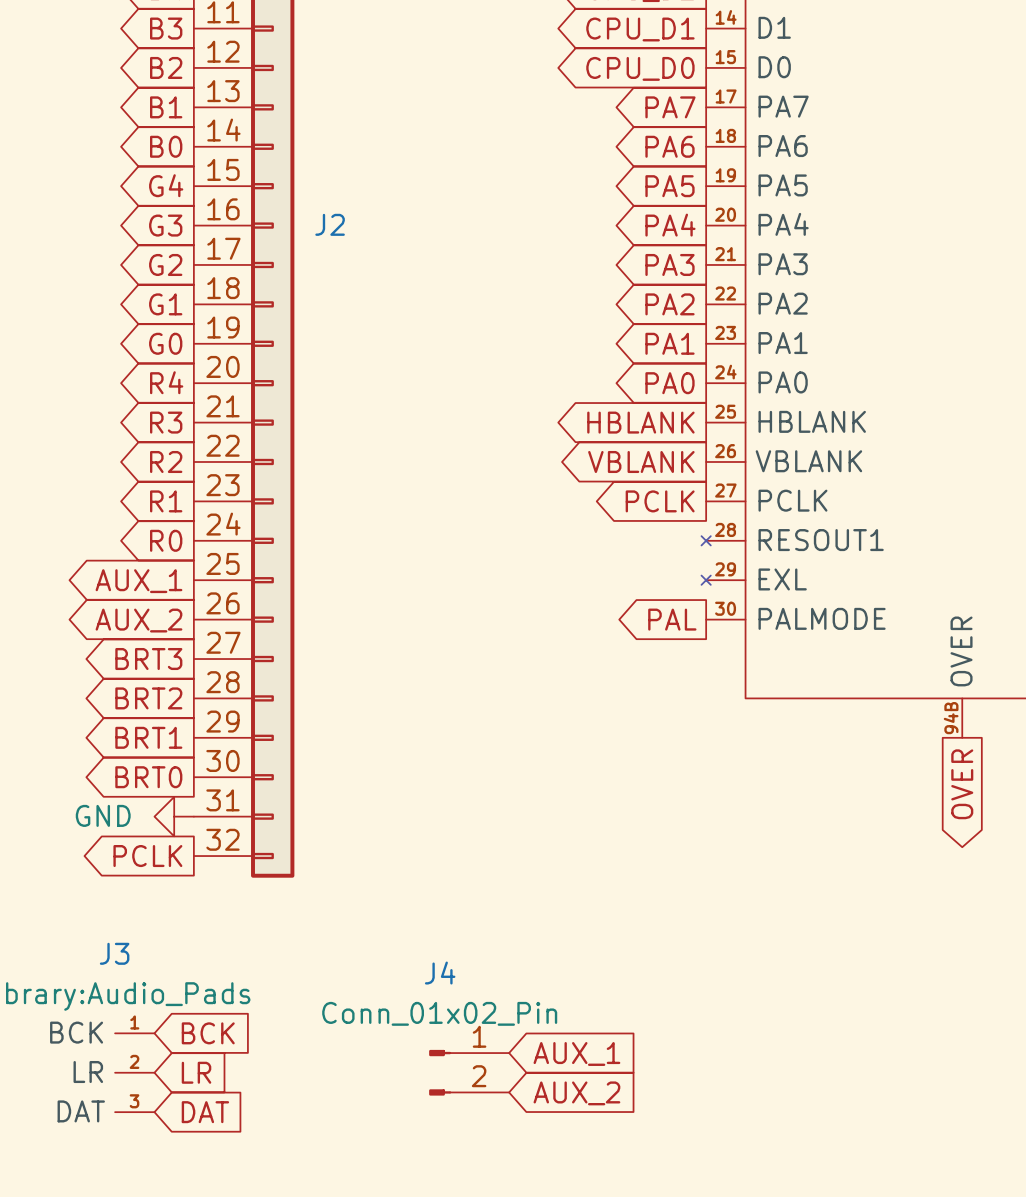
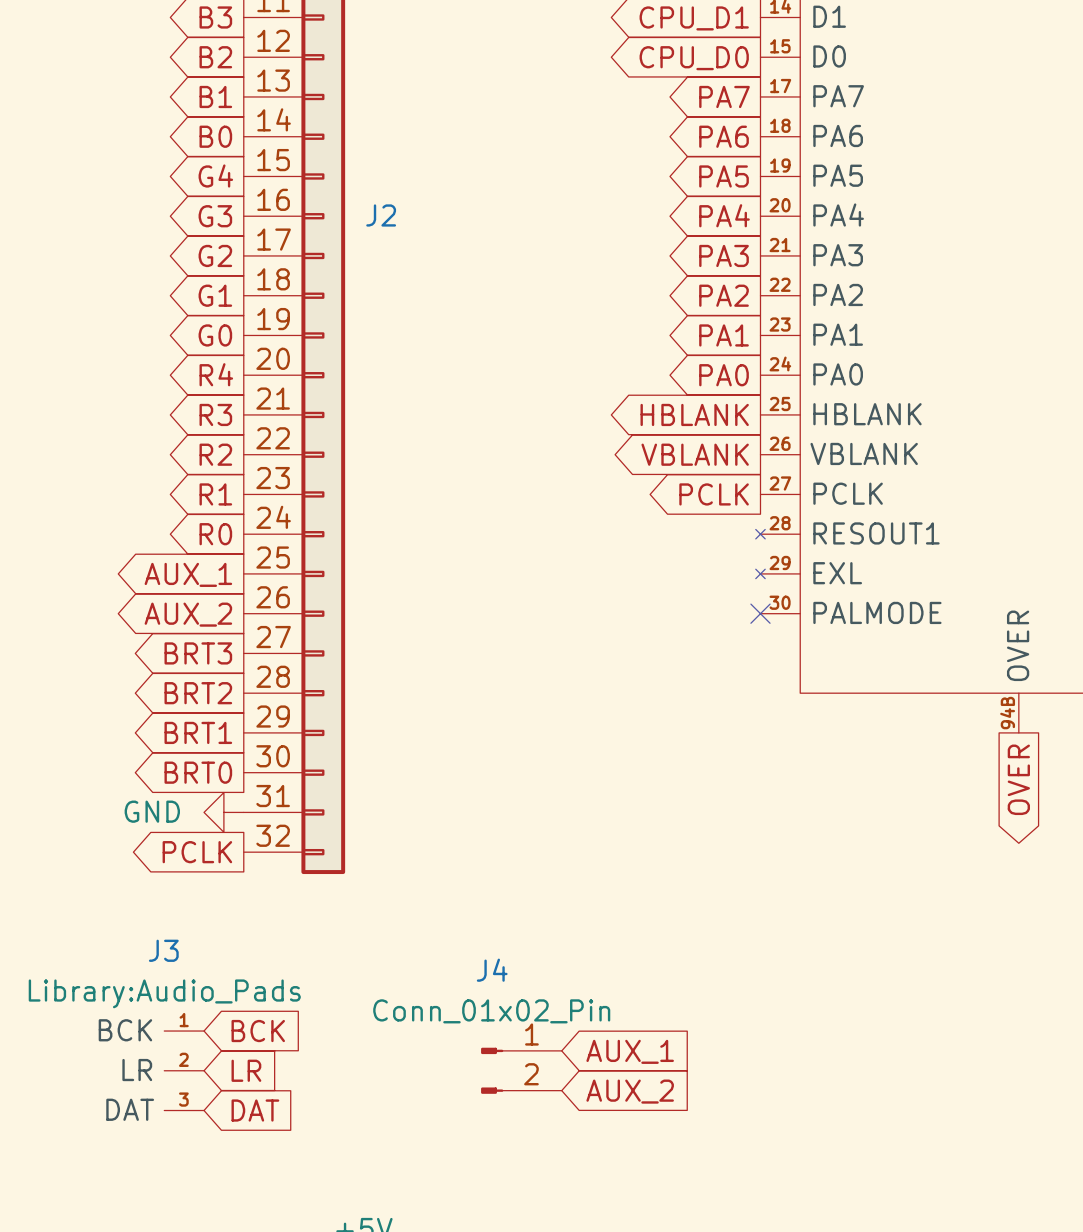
global label: PAL (672, 619) -> none
no-connect mark: none -> (760, 613)

